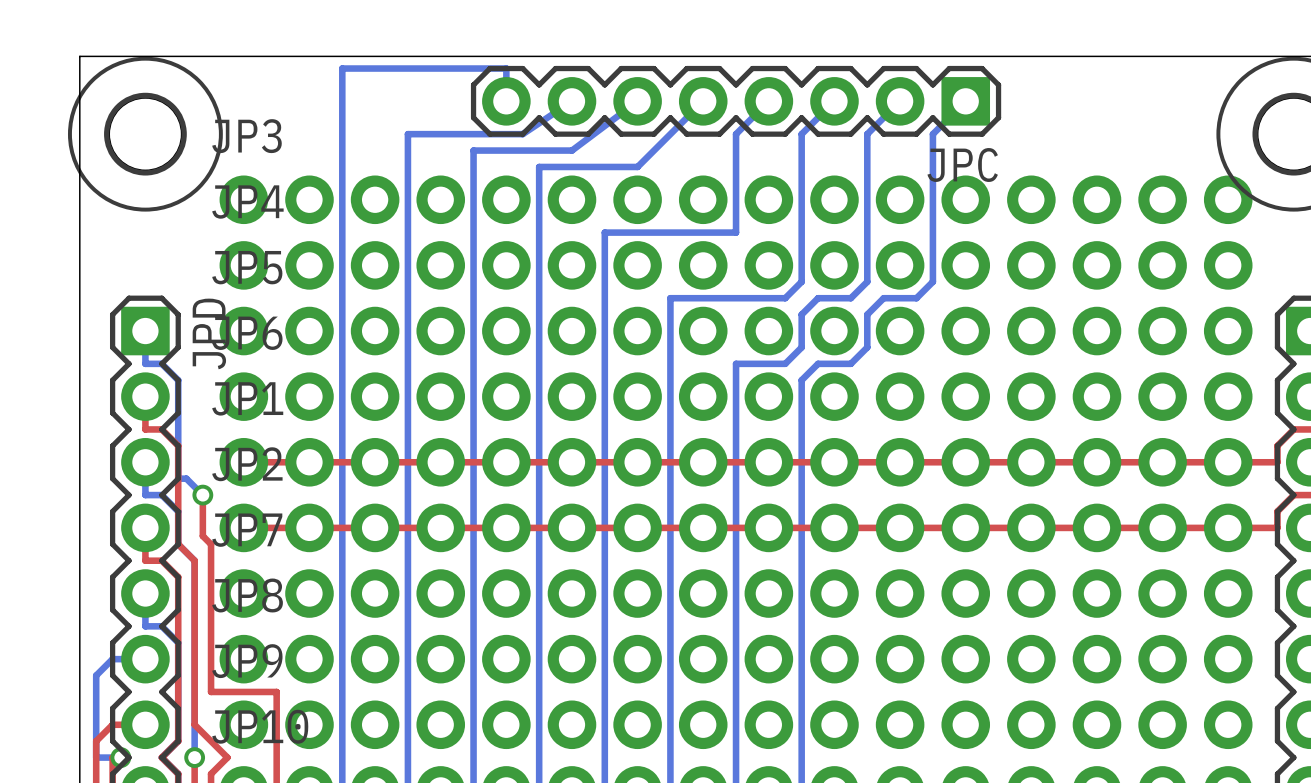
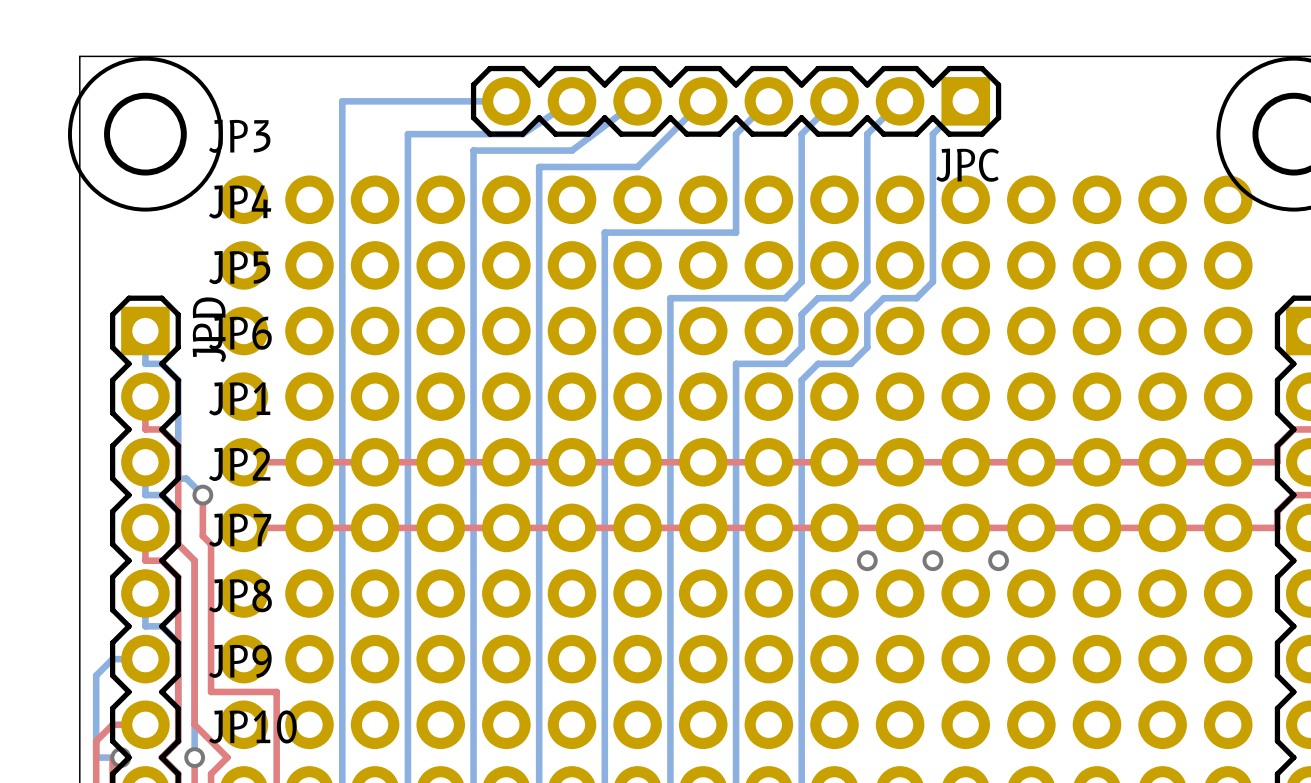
bottom track: (342, 101) (342, 68) (506, 68) (506, 101) -> (342, 101) (506, 101)
via: none -> (867, 560)
via: none -> (932, 560)
via: none -> (998, 560)

